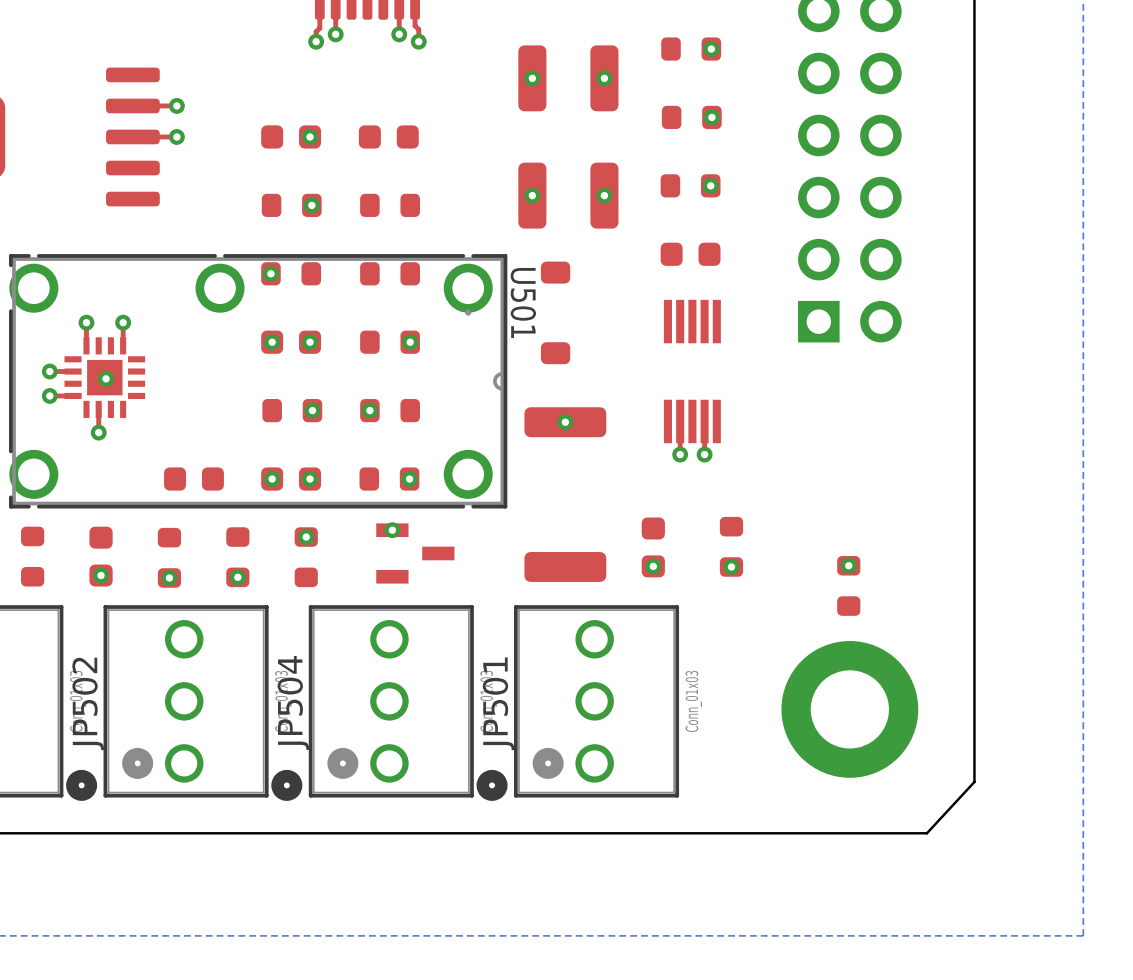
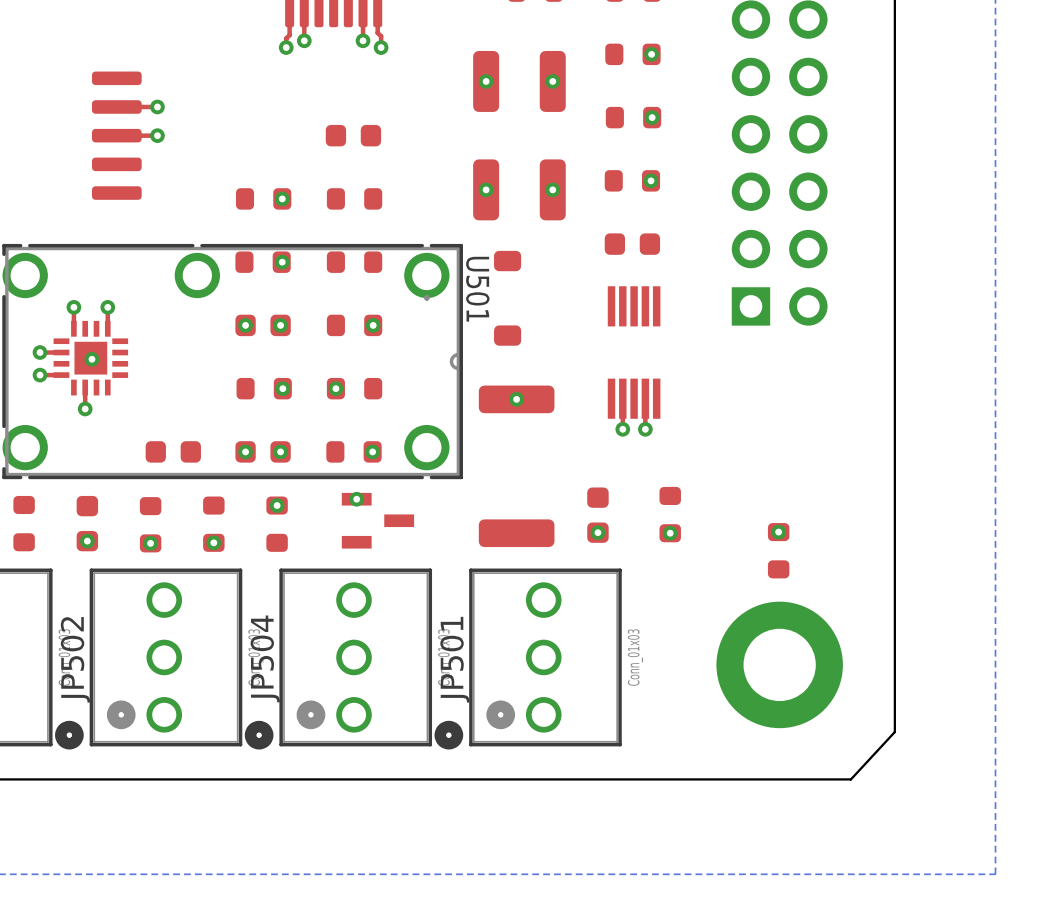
part: (291, 136) -> none
via: (310, 136) -> none
via position: (270, 273) -> (282, 262)

